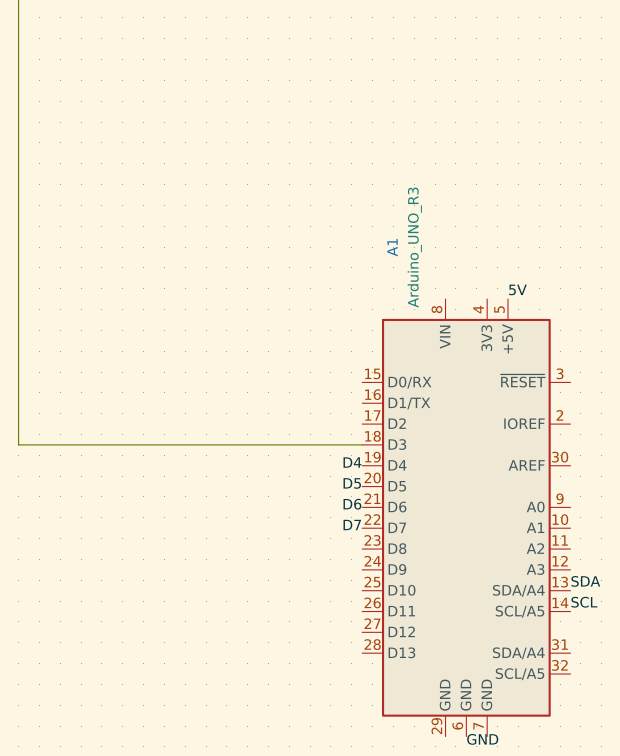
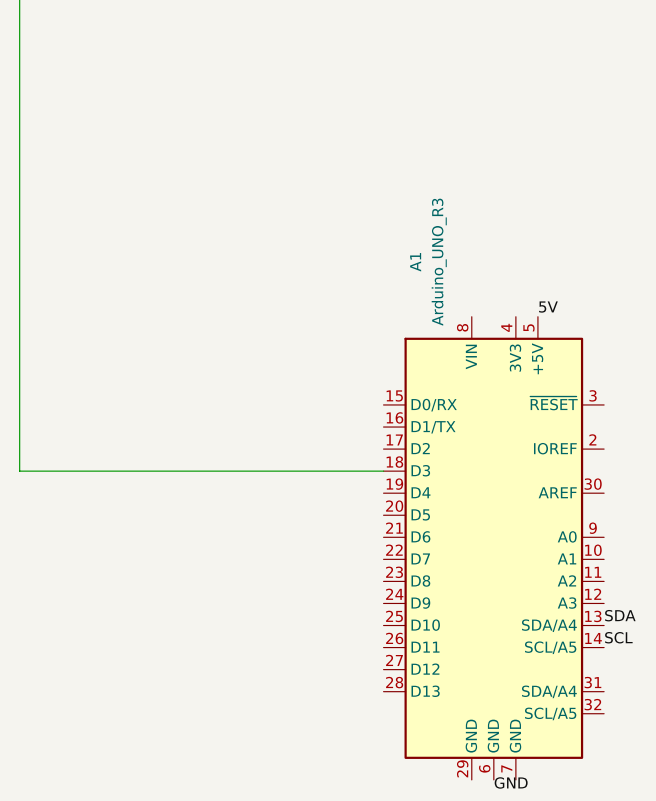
label: D4 (352, 462) -> none
label: D5 (352, 483) -> none
label: D6 (352, 504) -> none
label: D7 (352, 525) -> none

